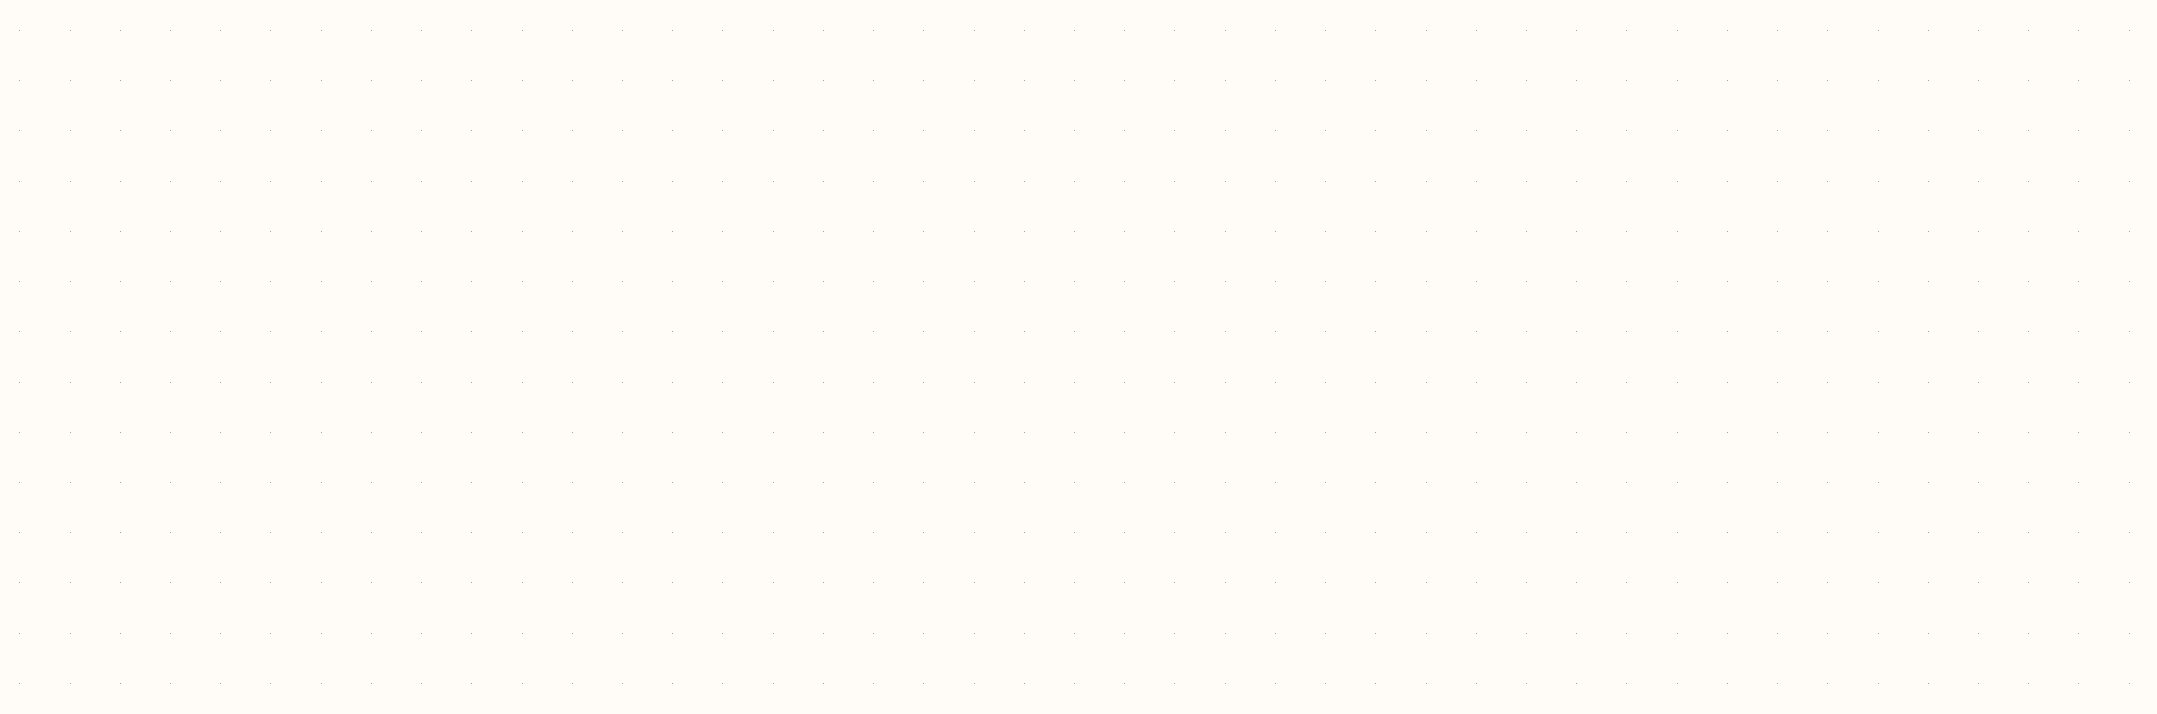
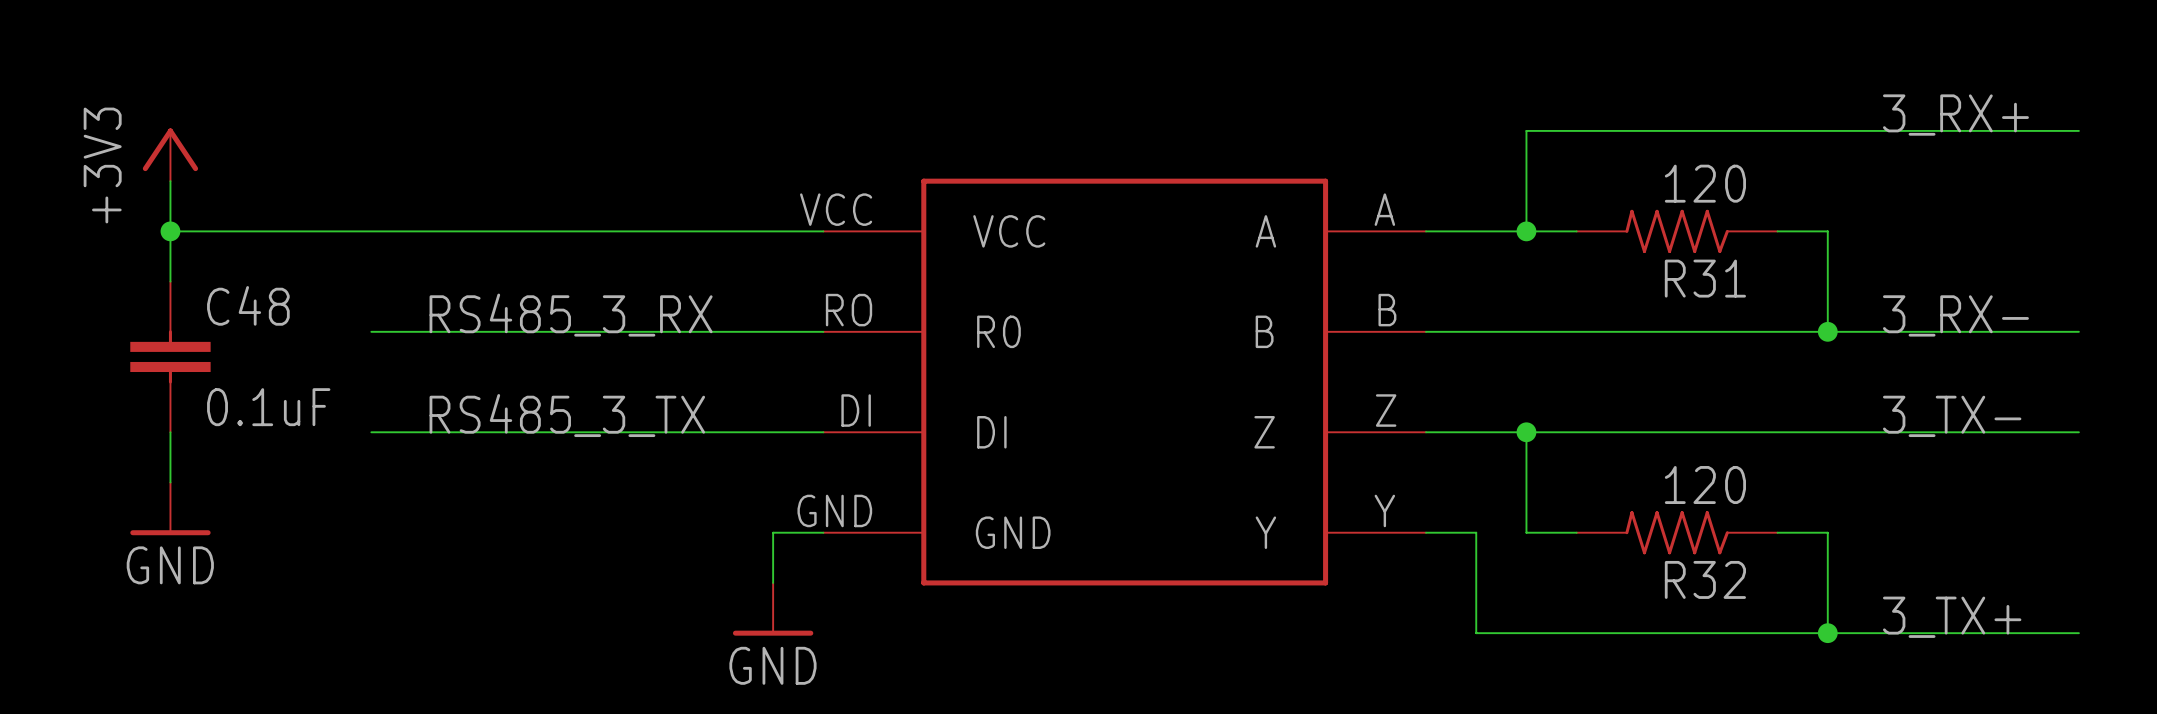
label: none -> 3_RX+ (1955, 115)
wire: none -> (2078, 130) (1526, 130) (1526, 231)
power symbol: none -> +3V3 (170, 154)
wire: none -> (170, 181) (170, 281)
wire: none -> (170, 231) (823, 231)
junction: none -> (170, 231)
wire: none -> (1426, 231) (1576, 231)
junction: none -> (1526, 231)
R31: none -> 120 (1677, 231)
wire: none -> (1777, 231) (1827, 231) (1827, 331)
label: none -> RS485_3_RX (571, 315)
label: none -> 3_RX- (1955, 315)
wire: none -> (371, 331) (823, 331)
wire: none -> (1426, 331) (2078, 331)
junction: none -> (1827, 331)
C48: none -> 0.1uF (170, 356)
part: none -> (1124, 382)
label: none -> RS485_3_TX (567, 415)
label: none -> 3_TX- (1952, 416)
wire: none -> (170, 432) (170, 482)
wire: none -> (371, 432) (823, 432)
wire: none -> (1426, 432) (2078, 432)
wire: none -> (1526, 432) (1526, 532) (1576, 532)
junction: none -> (1526, 432)
power symbol: none -> GND (170, 508)
wire: none -> (823, 532) (773, 532) (773, 582)
wire: none -> (1426, 532) (1476, 532) (1476, 633) (2078, 633)
R32: none -> 120 (1677, 532)
wire: none -> (1777, 532) (1827, 532) (1827, 633)
power symbol: none -> GND (773, 609)
label: none -> 3_TX+ (1952, 617)
junction: none -> (1827, 633)

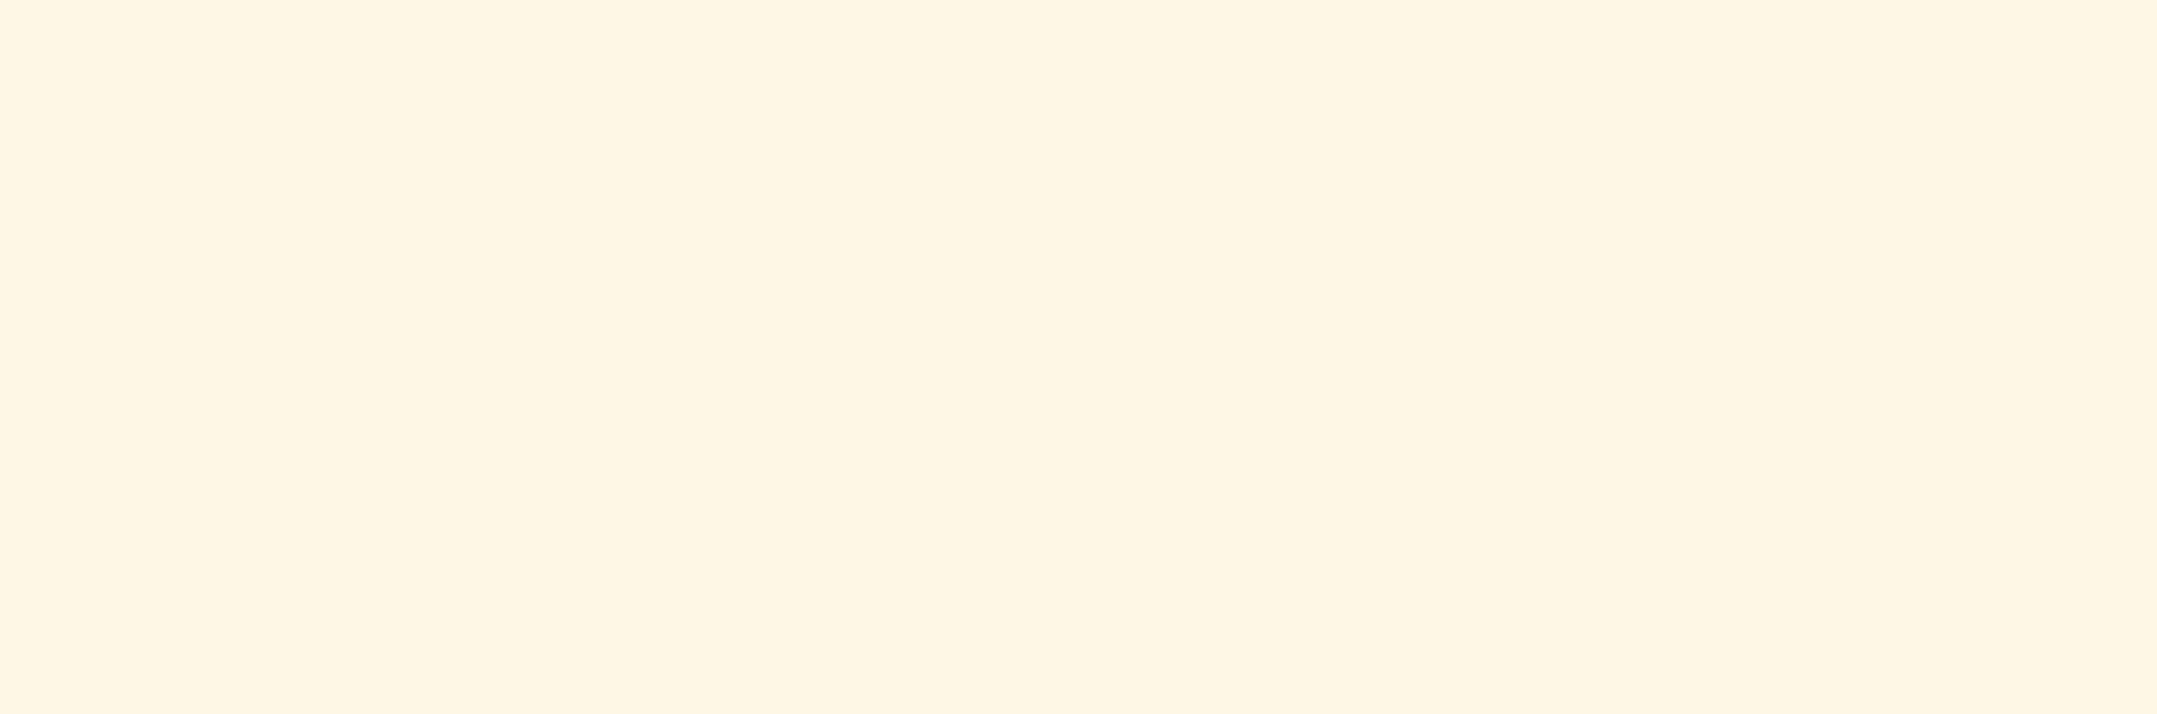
label: 3_RX+ (1955, 115) -> none
wire: (2078, 130) (1526, 130) (1526, 231) -> none
power symbol: +3V3 (170, 154) -> none
wire: (170, 181) (170, 281) -> none
wire: (170, 231) (823, 231) -> none
junction: (170, 231) -> none
wire: (1426, 231) (1576, 231) -> none
junction: (1526, 231) -> none
R31: 120 (1677, 231) -> none
wire: (1777, 231) (1827, 231) (1827, 331) -> none
label: RS485_3_RX (571, 315) -> none
label: 3_RX- (1955, 315) -> none
wire: (371, 331) (823, 331) -> none
wire: (1426, 331) (2078, 331) -> none
junction: (1827, 331) -> none
C48: 0.1uF (170, 356) -> none
part: (1124, 382) -> none
label: RS485_3_TX (567, 415) -> none
label: 3_TX- (1952, 416) -> none
wire: (170, 432) (170, 482) -> none
wire: (371, 432) (823, 432) -> none
wire: (1426, 432) (2078, 432) -> none
wire: (1526, 432) (1526, 532) (1576, 532) -> none
junction: (1526, 432) -> none
power symbol: GND (170, 508) -> none
wire: (823, 532) (773, 532) (773, 582) -> none
wire: (1426, 532) (1476, 532) (1476, 633) (2078, 633) -> none
R32: 120 (1677, 532) -> none
wire: (1777, 532) (1827, 532) (1827, 633) -> none
power symbol: GND (773, 609) -> none
label: 3_TX+ (1952, 617) -> none
junction: (1827, 633) -> none

